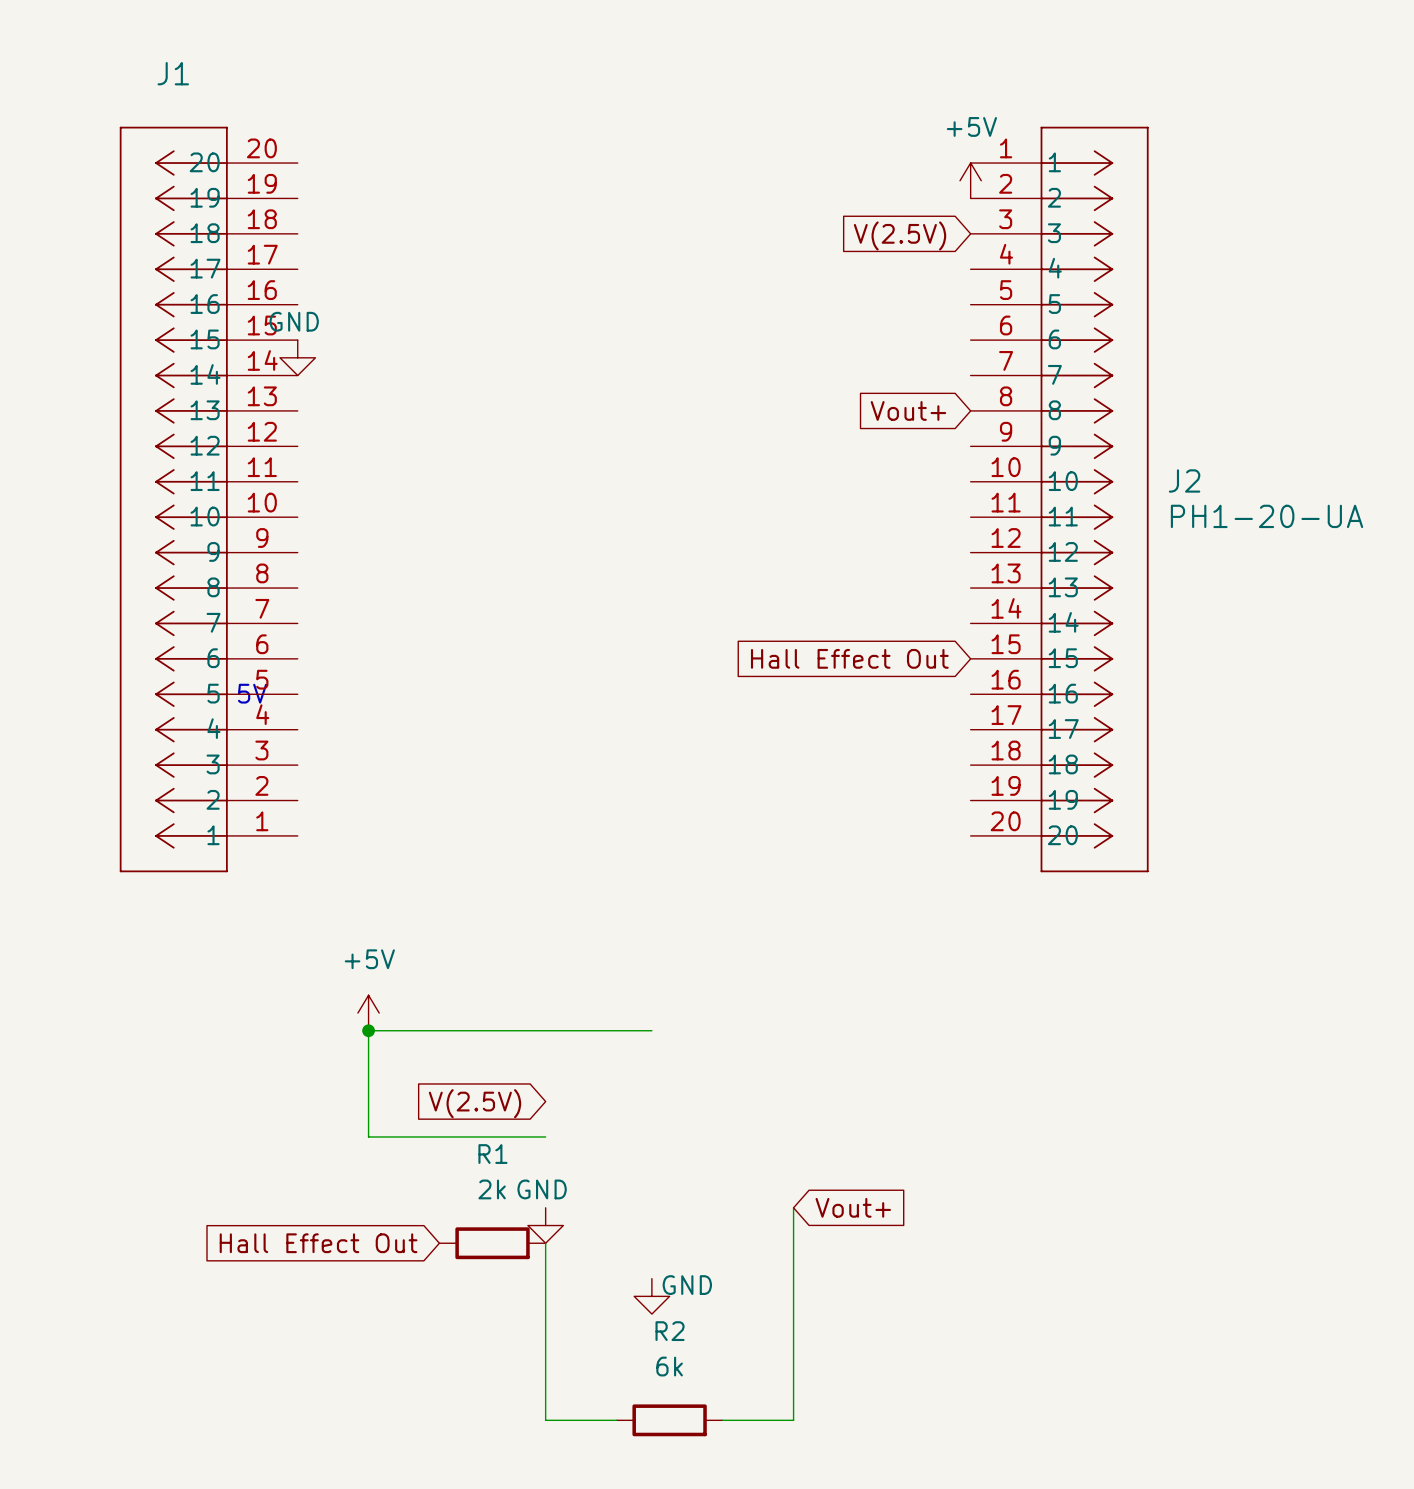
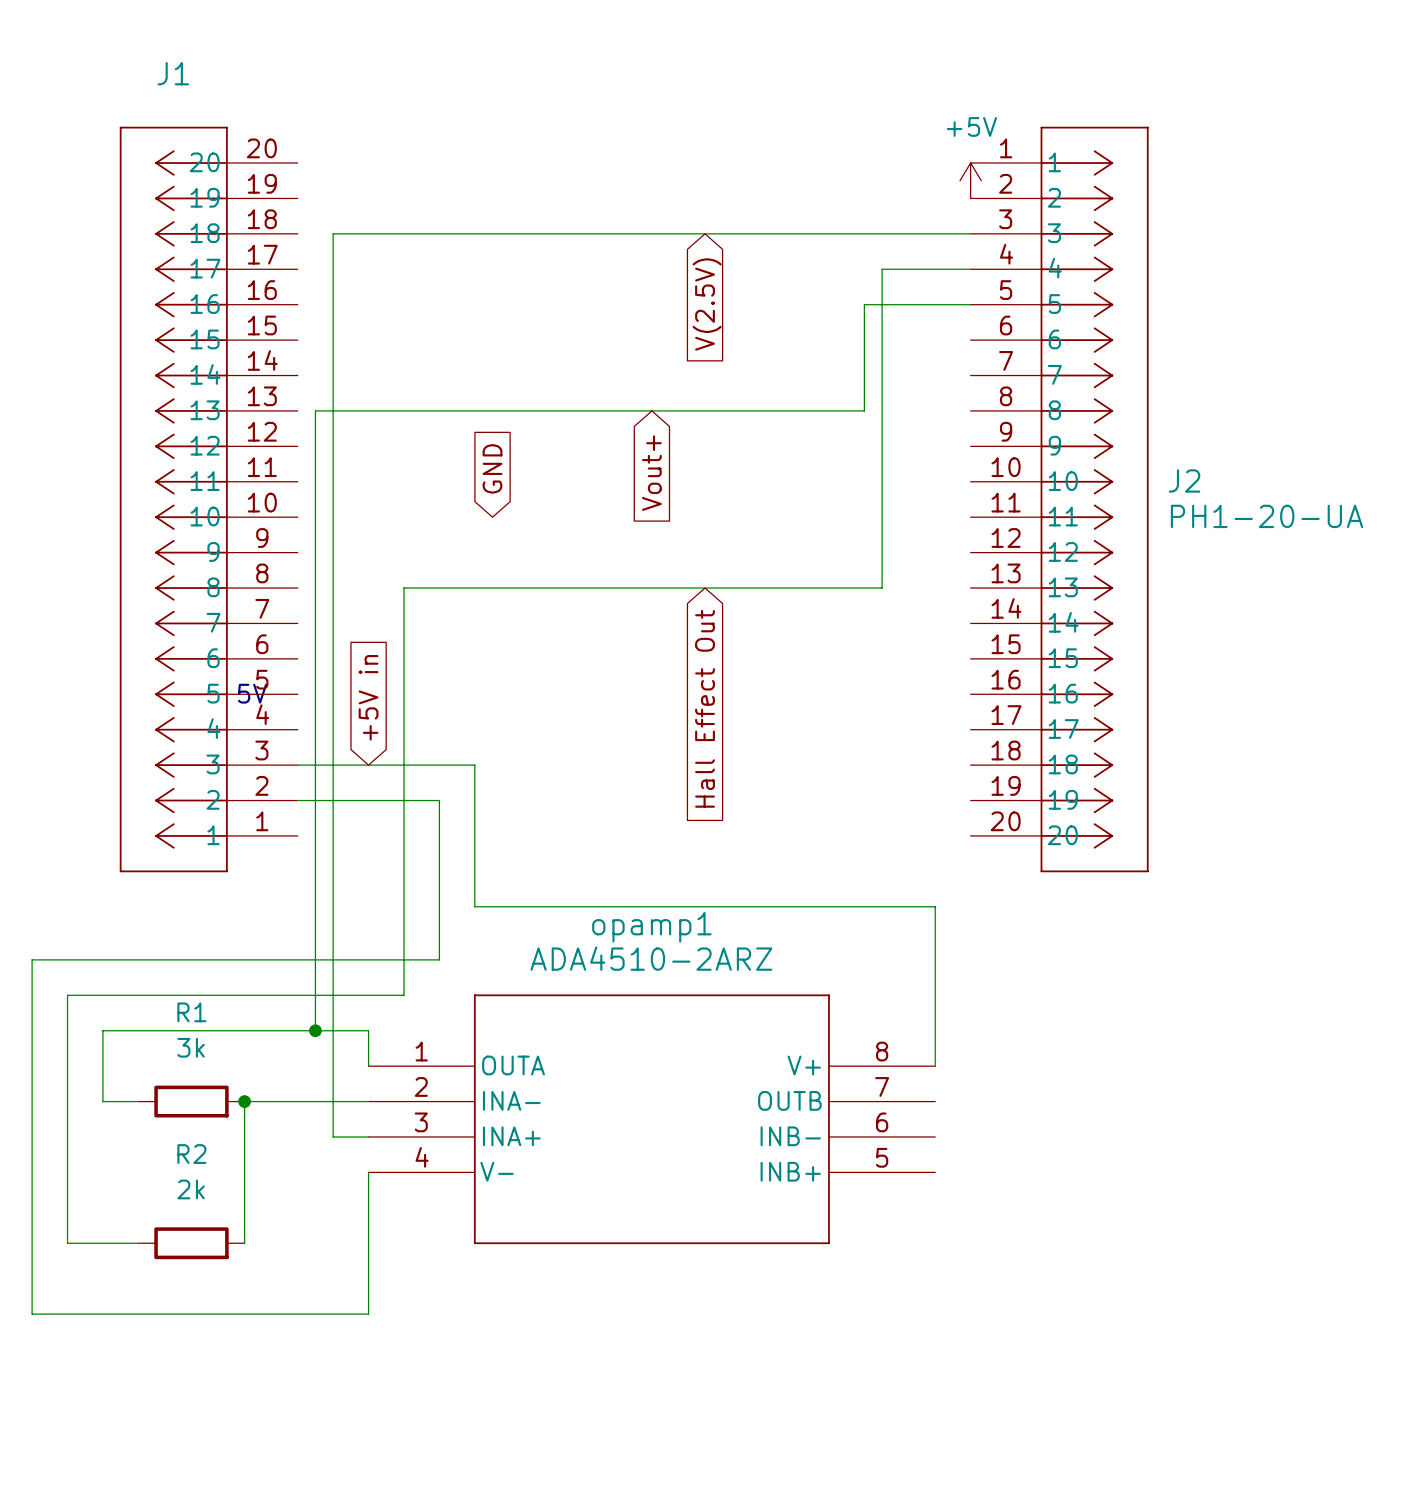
wire: none -> (970, 233) (333, 233) (333, 1136) (368, 1136)
global label rotation: 0° (900, 235) -> 90° counterclockwise (707, 304)
global label position: V(2.5V) (900, 235) -> V(2.5V) (707, 304)
wire: none -> (970, 269) (882, 269) (882, 588) (403, 588) (403, 995) (67, 995) (67, 1243) (138, 1243)
wire: none -> (970, 304) (864, 304) (864, 410) (315, 410) (315, 1030)
power symbol: GND (297, 357) -> none
global label rotation: 0° (908, 410) -> 90° counterclockwise (651, 473)
global label position: Vout+ (908, 410) -> Vout+ (651, 473)
global label: none -> GND (492, 468)
global label rotation: 0° (849, 658) -> 90° counterclockwise (705, 708)
global label: none -> +5V in (368, 697)
wire: none -> (297, 765) (474, 765) (474, 906) (935, 906) (935, 1066)
wire: none -> (297, 800) (439, 800) (439, 959) (32, 959) (32, 1314) (368, 1314) (368, 1172)
power symbol: +5V (368, 1013) -> none
wire: (368, 1030) (651, 1030) -> (368, 1030) (102, 1030) (102, 1101) (138, 1101)
junction position: (368, 1030) -> (315, 1030)
wire: (368, 1066) (368, 1136) (545, 1136) -> none
junction: none -> (244, 1101)
wire: none -> (368, 1101) (244, 1101) (244, 1243)
global label: V(2.5V) (475, 1103) -> none
opamp1: none -> ADA4510-2ARZ (651, 1119)
R1 value: 2k (492, 1189) -> 3k (191, 1047)
wire: (793, 1207) (793, 1420) (722, 1420) -> none
global label: Vout+ (853, 1207) -> none
power symbol: GND (545, 1225) -> none
global label: Hall Effect Out (318, 1243) -> none
R1 position: (492, 1243) -> (191, 1101)
wire: (545, 1243) (545, 1420) (616, 1420) -> none
power symbol: GND (651, 1296) -> none
R2 value: 6k (669, 1366) -> 2k (191, 1189)
R2 position: (669, 1420) -> (191, 1243)

